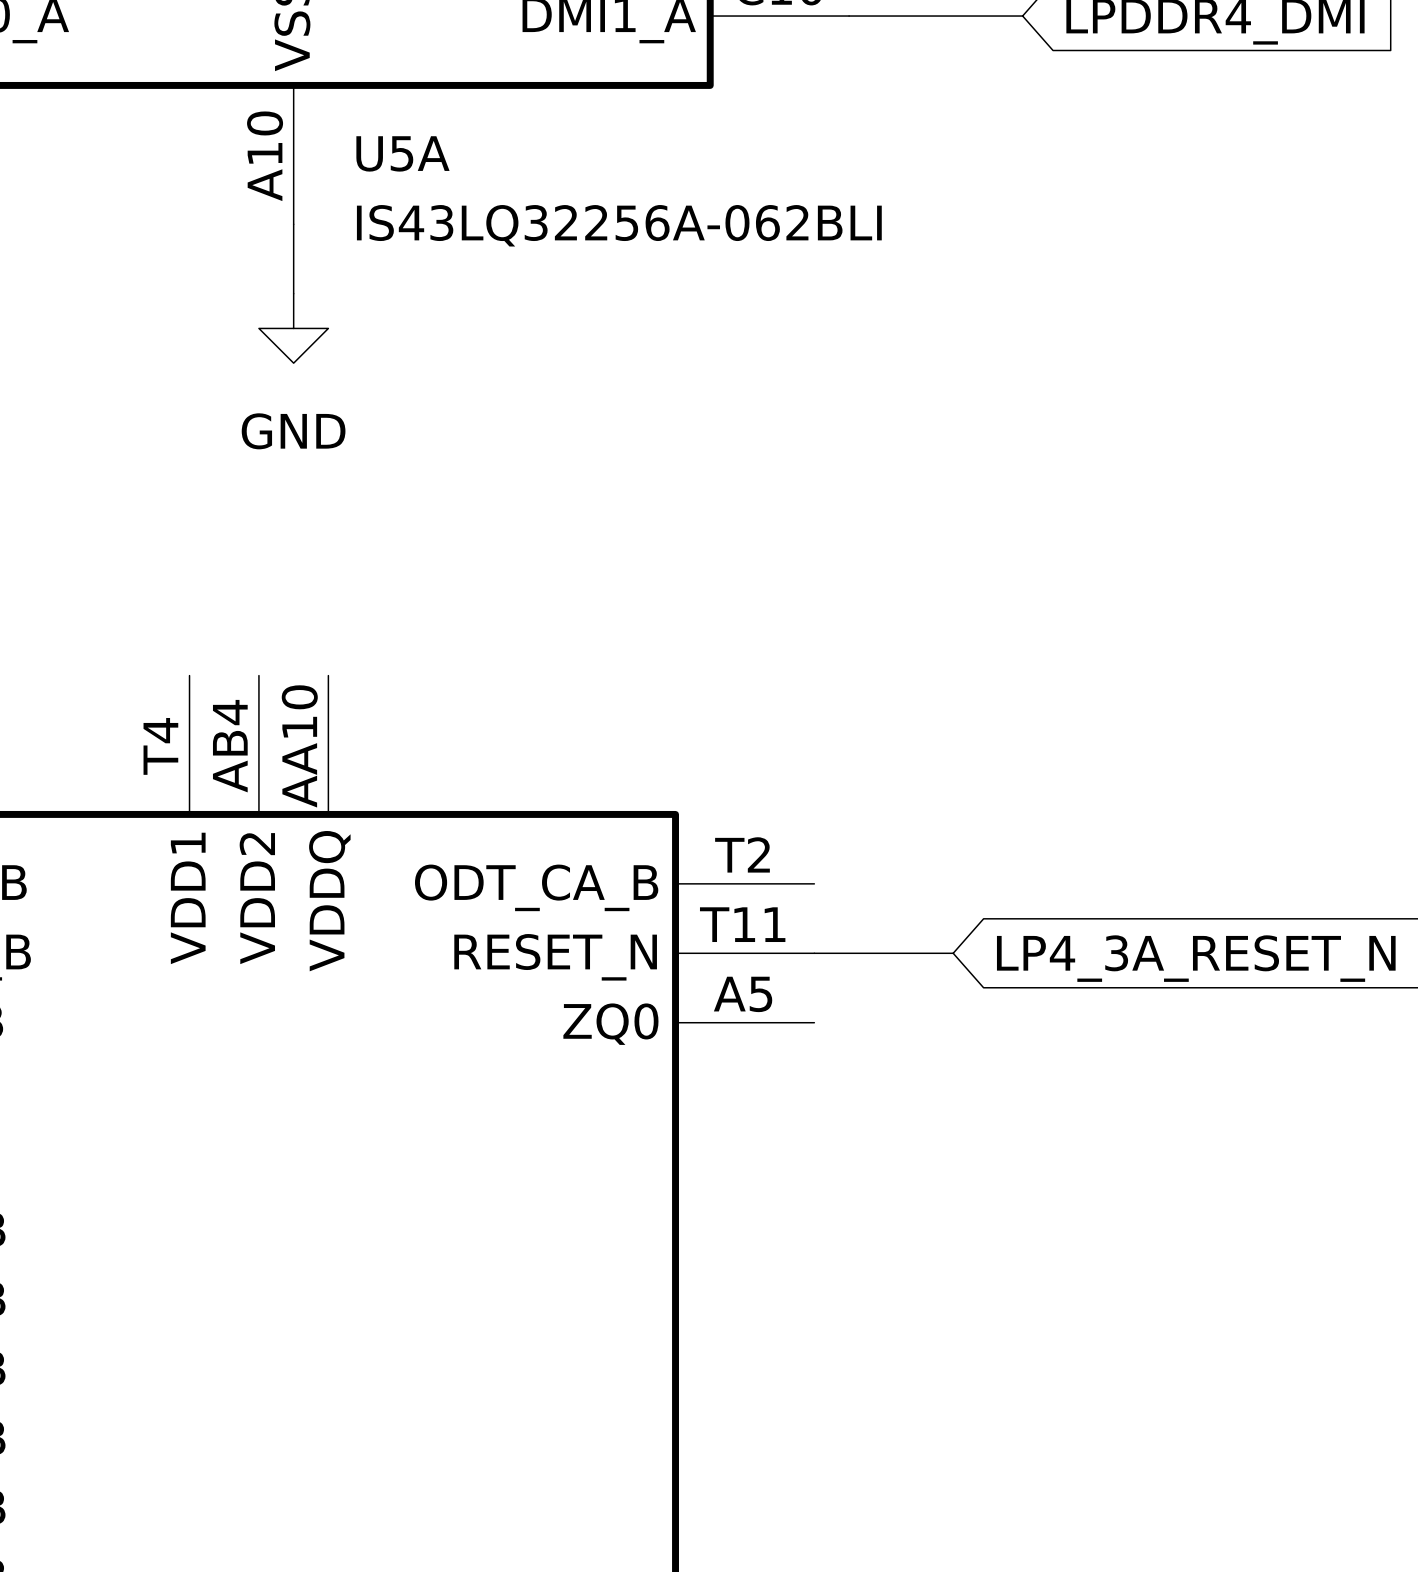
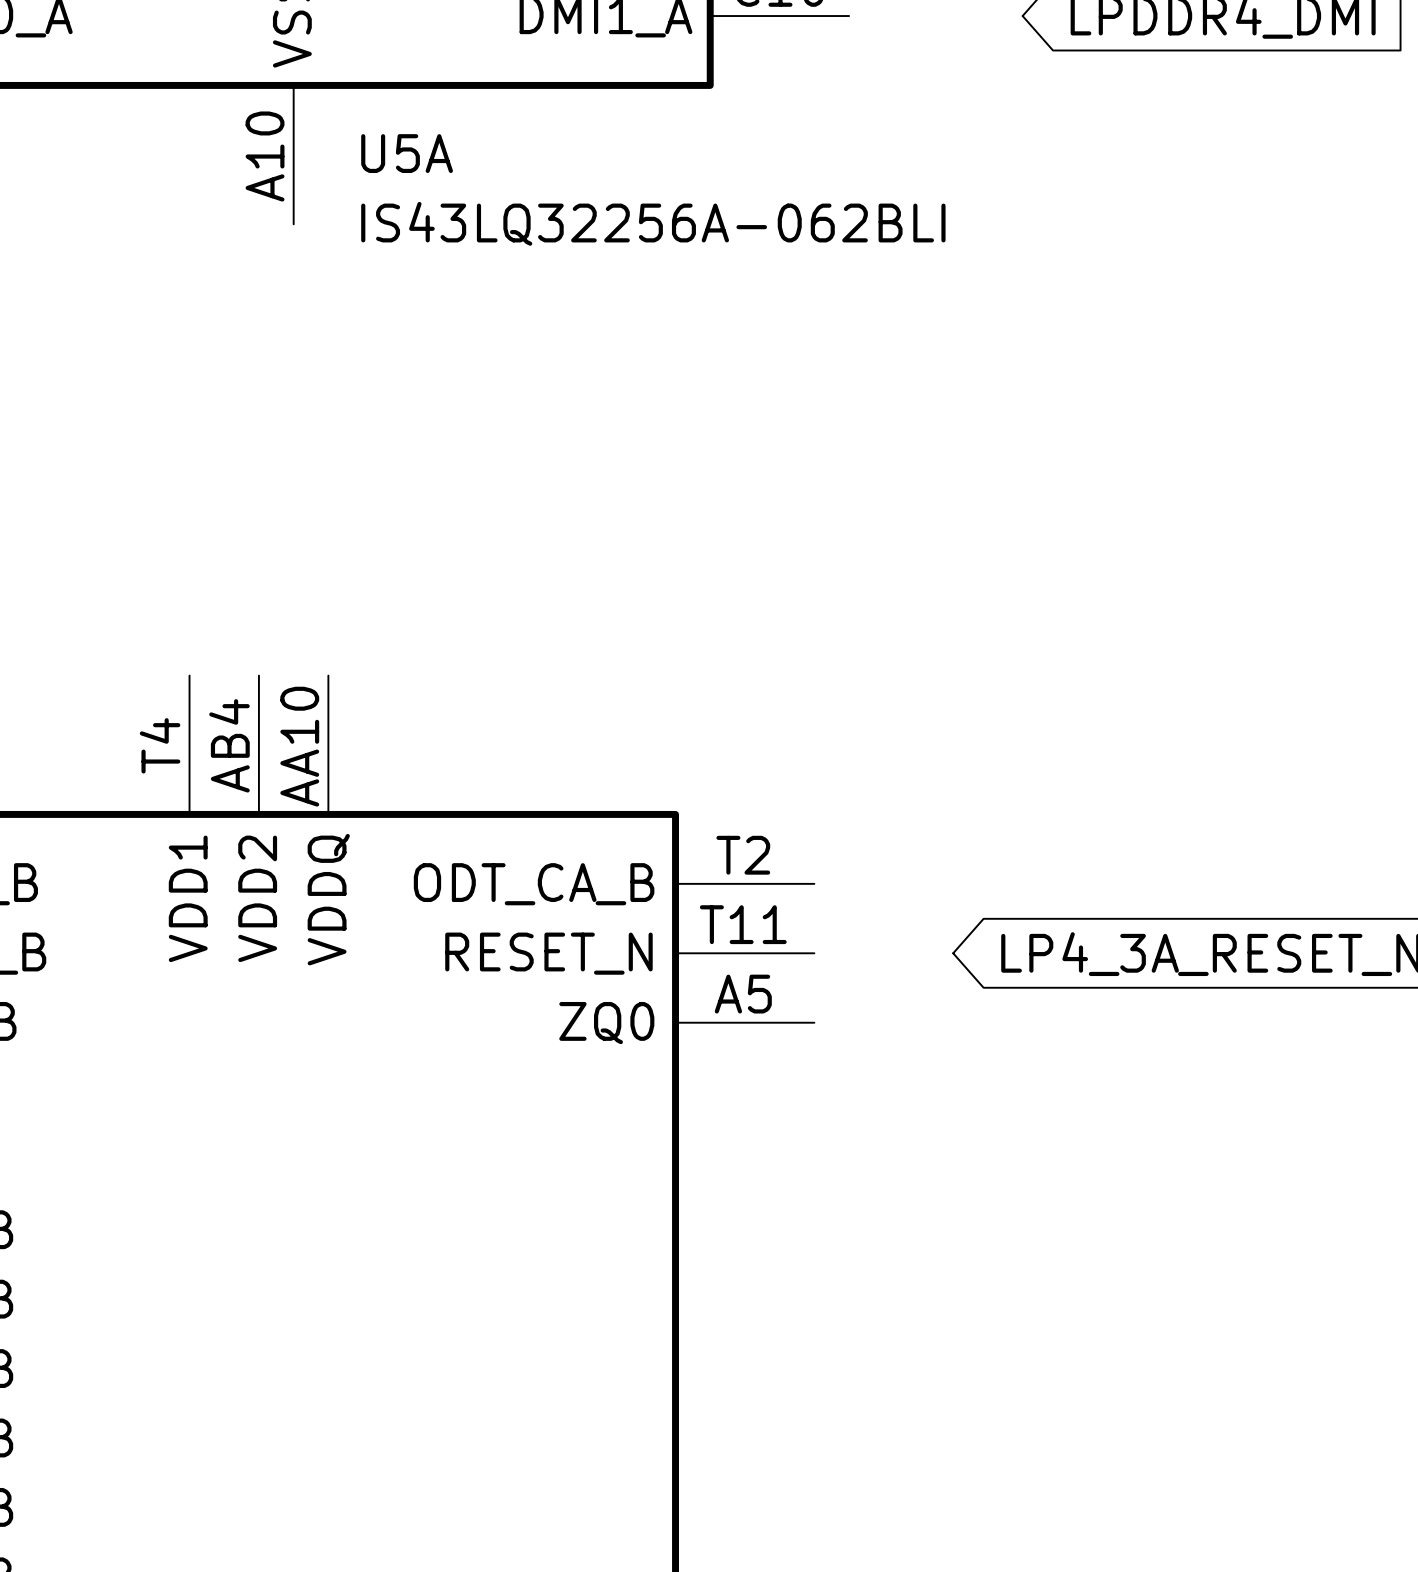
wire: (849, 16) (1022, 16) -> none
wire: (293, 224) (293, 293) -> none
power symbol: GND (293, 328) -> none
wire: (814, 953) (953, 953) -> none

